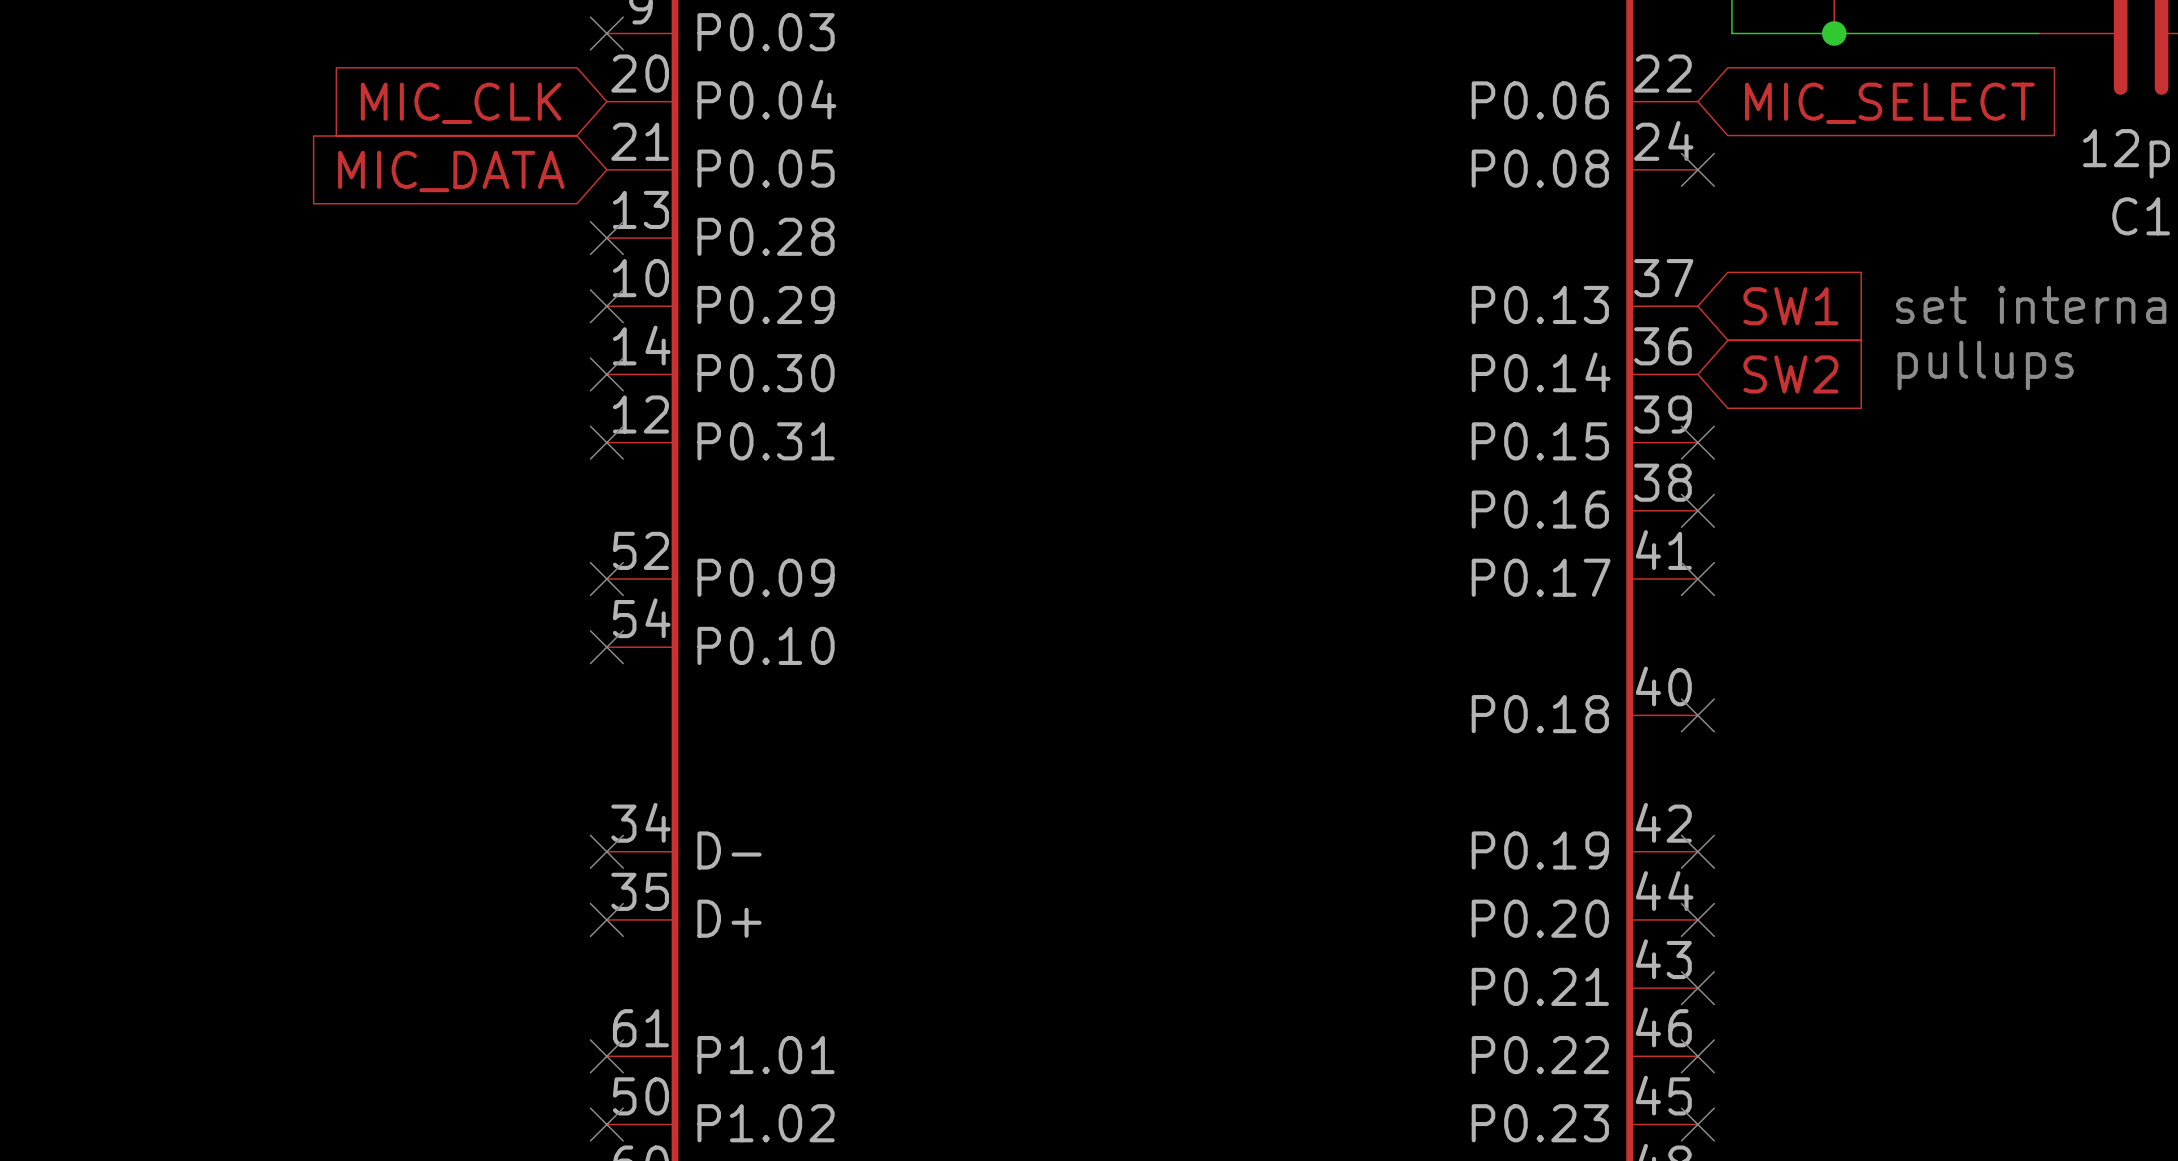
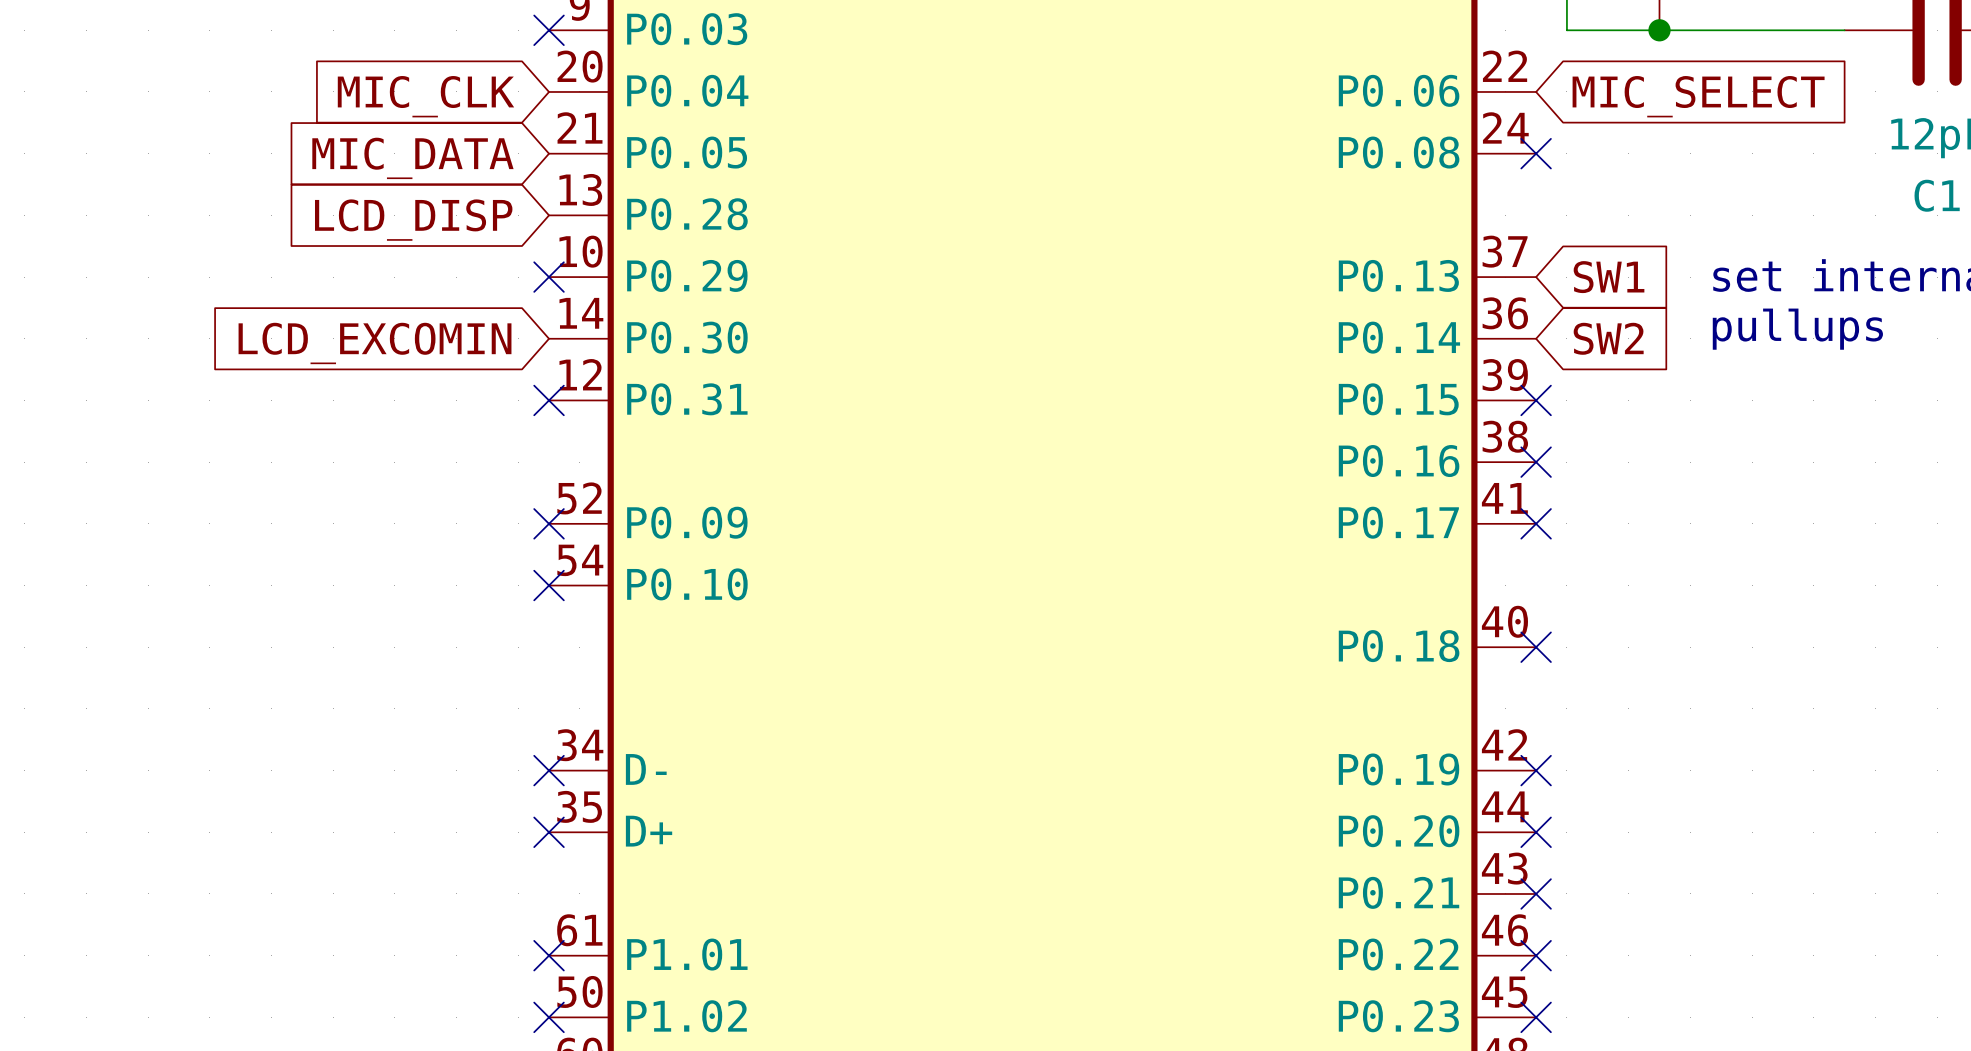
no-connect mark: (606, 238) -> none
global label: none -> LCD_DISP (413, 220)
no-connect mark: (606, 374) -> none
global label: none -> LCD_EXCOMIN (375, 343)

